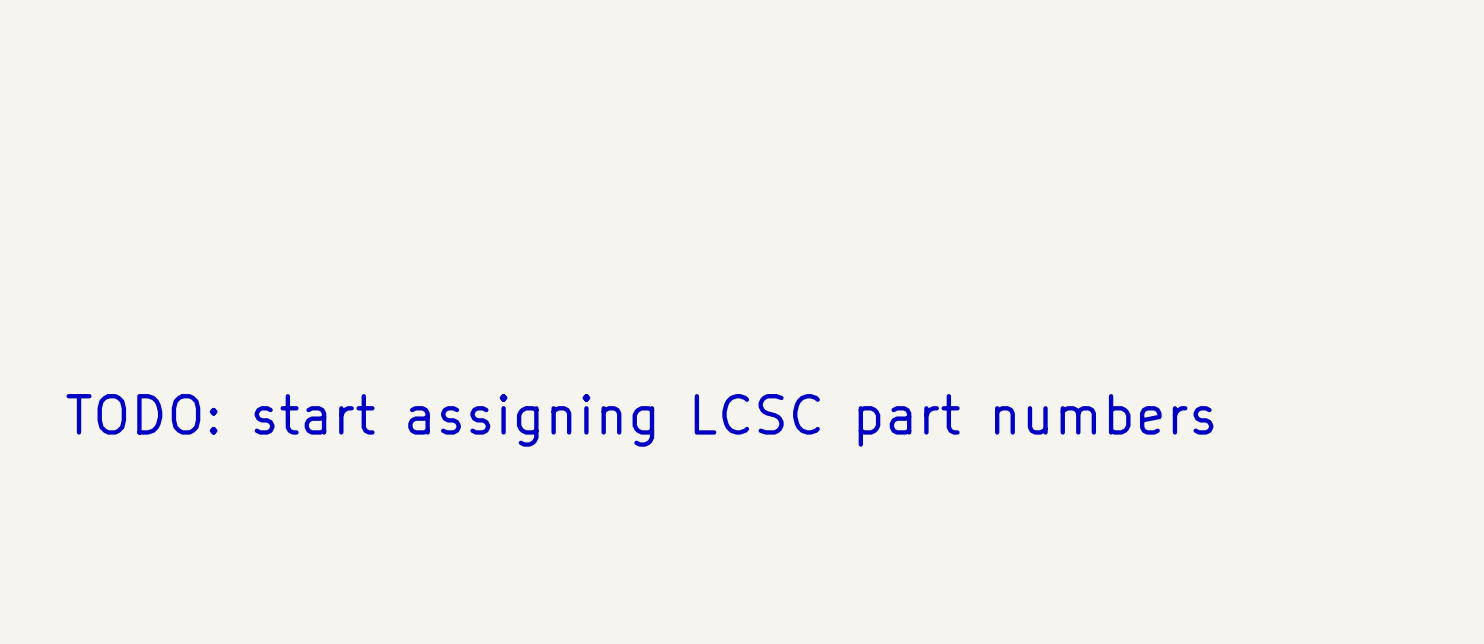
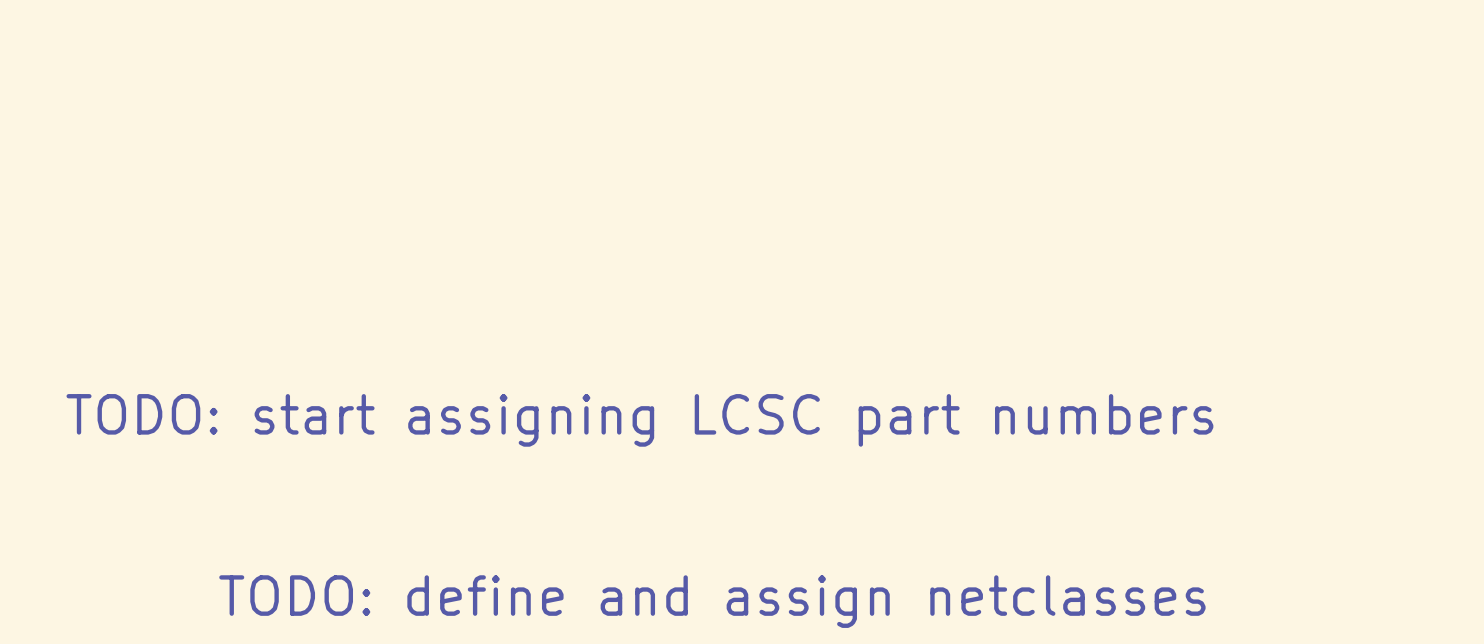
text: none -> TODO: define and assign netclasses (712, 601)

